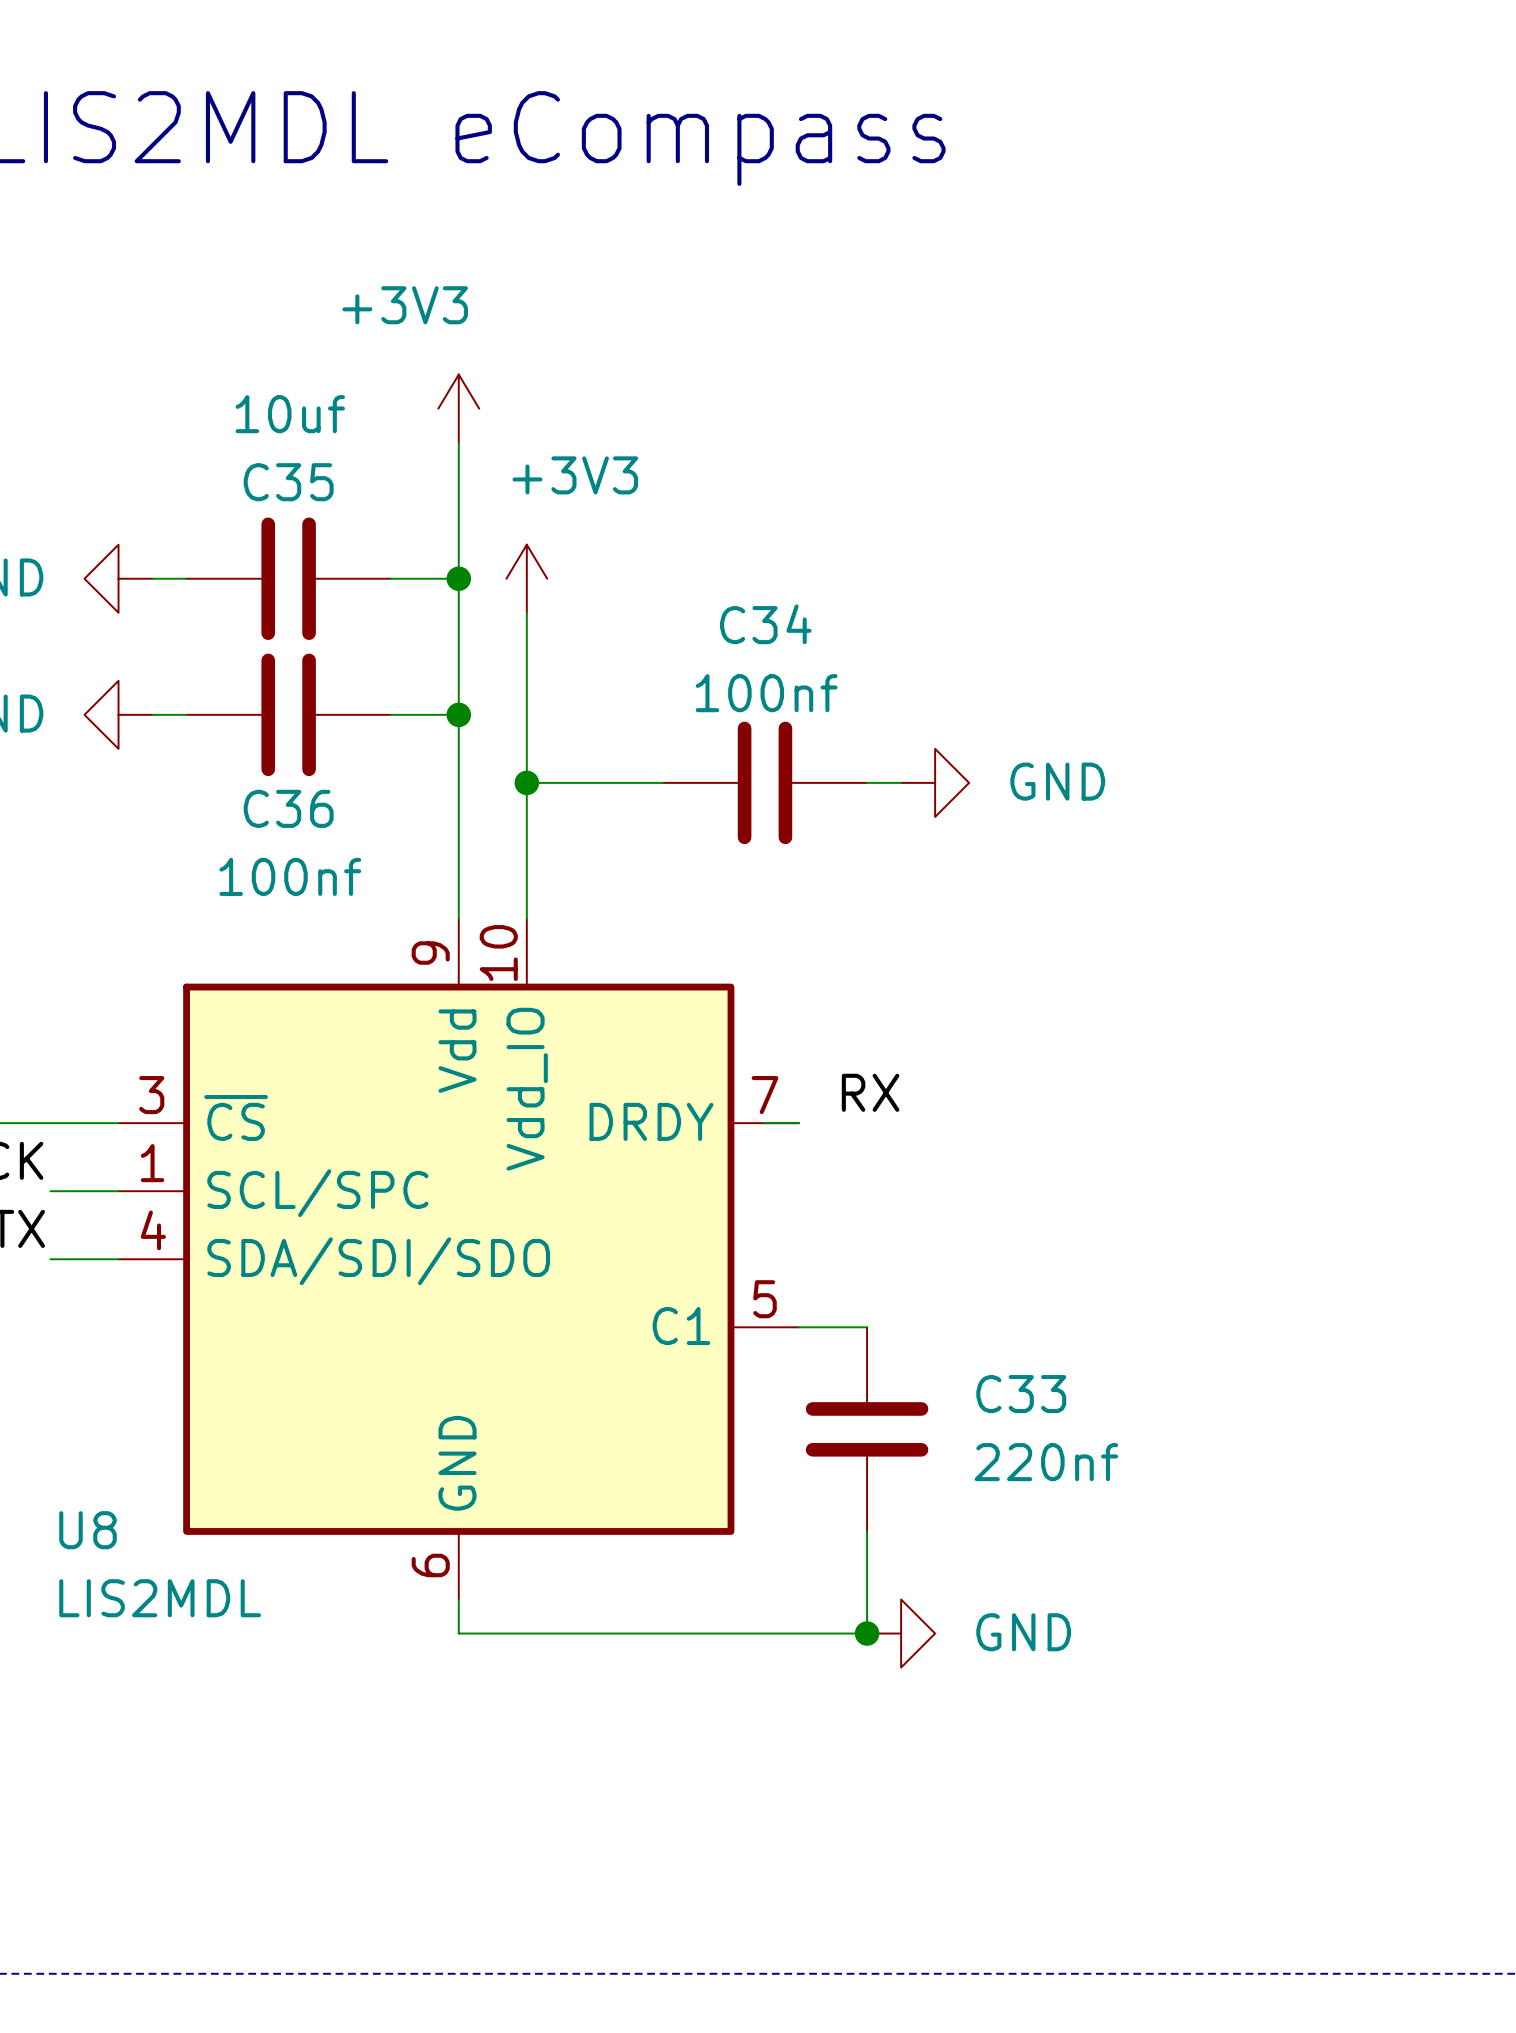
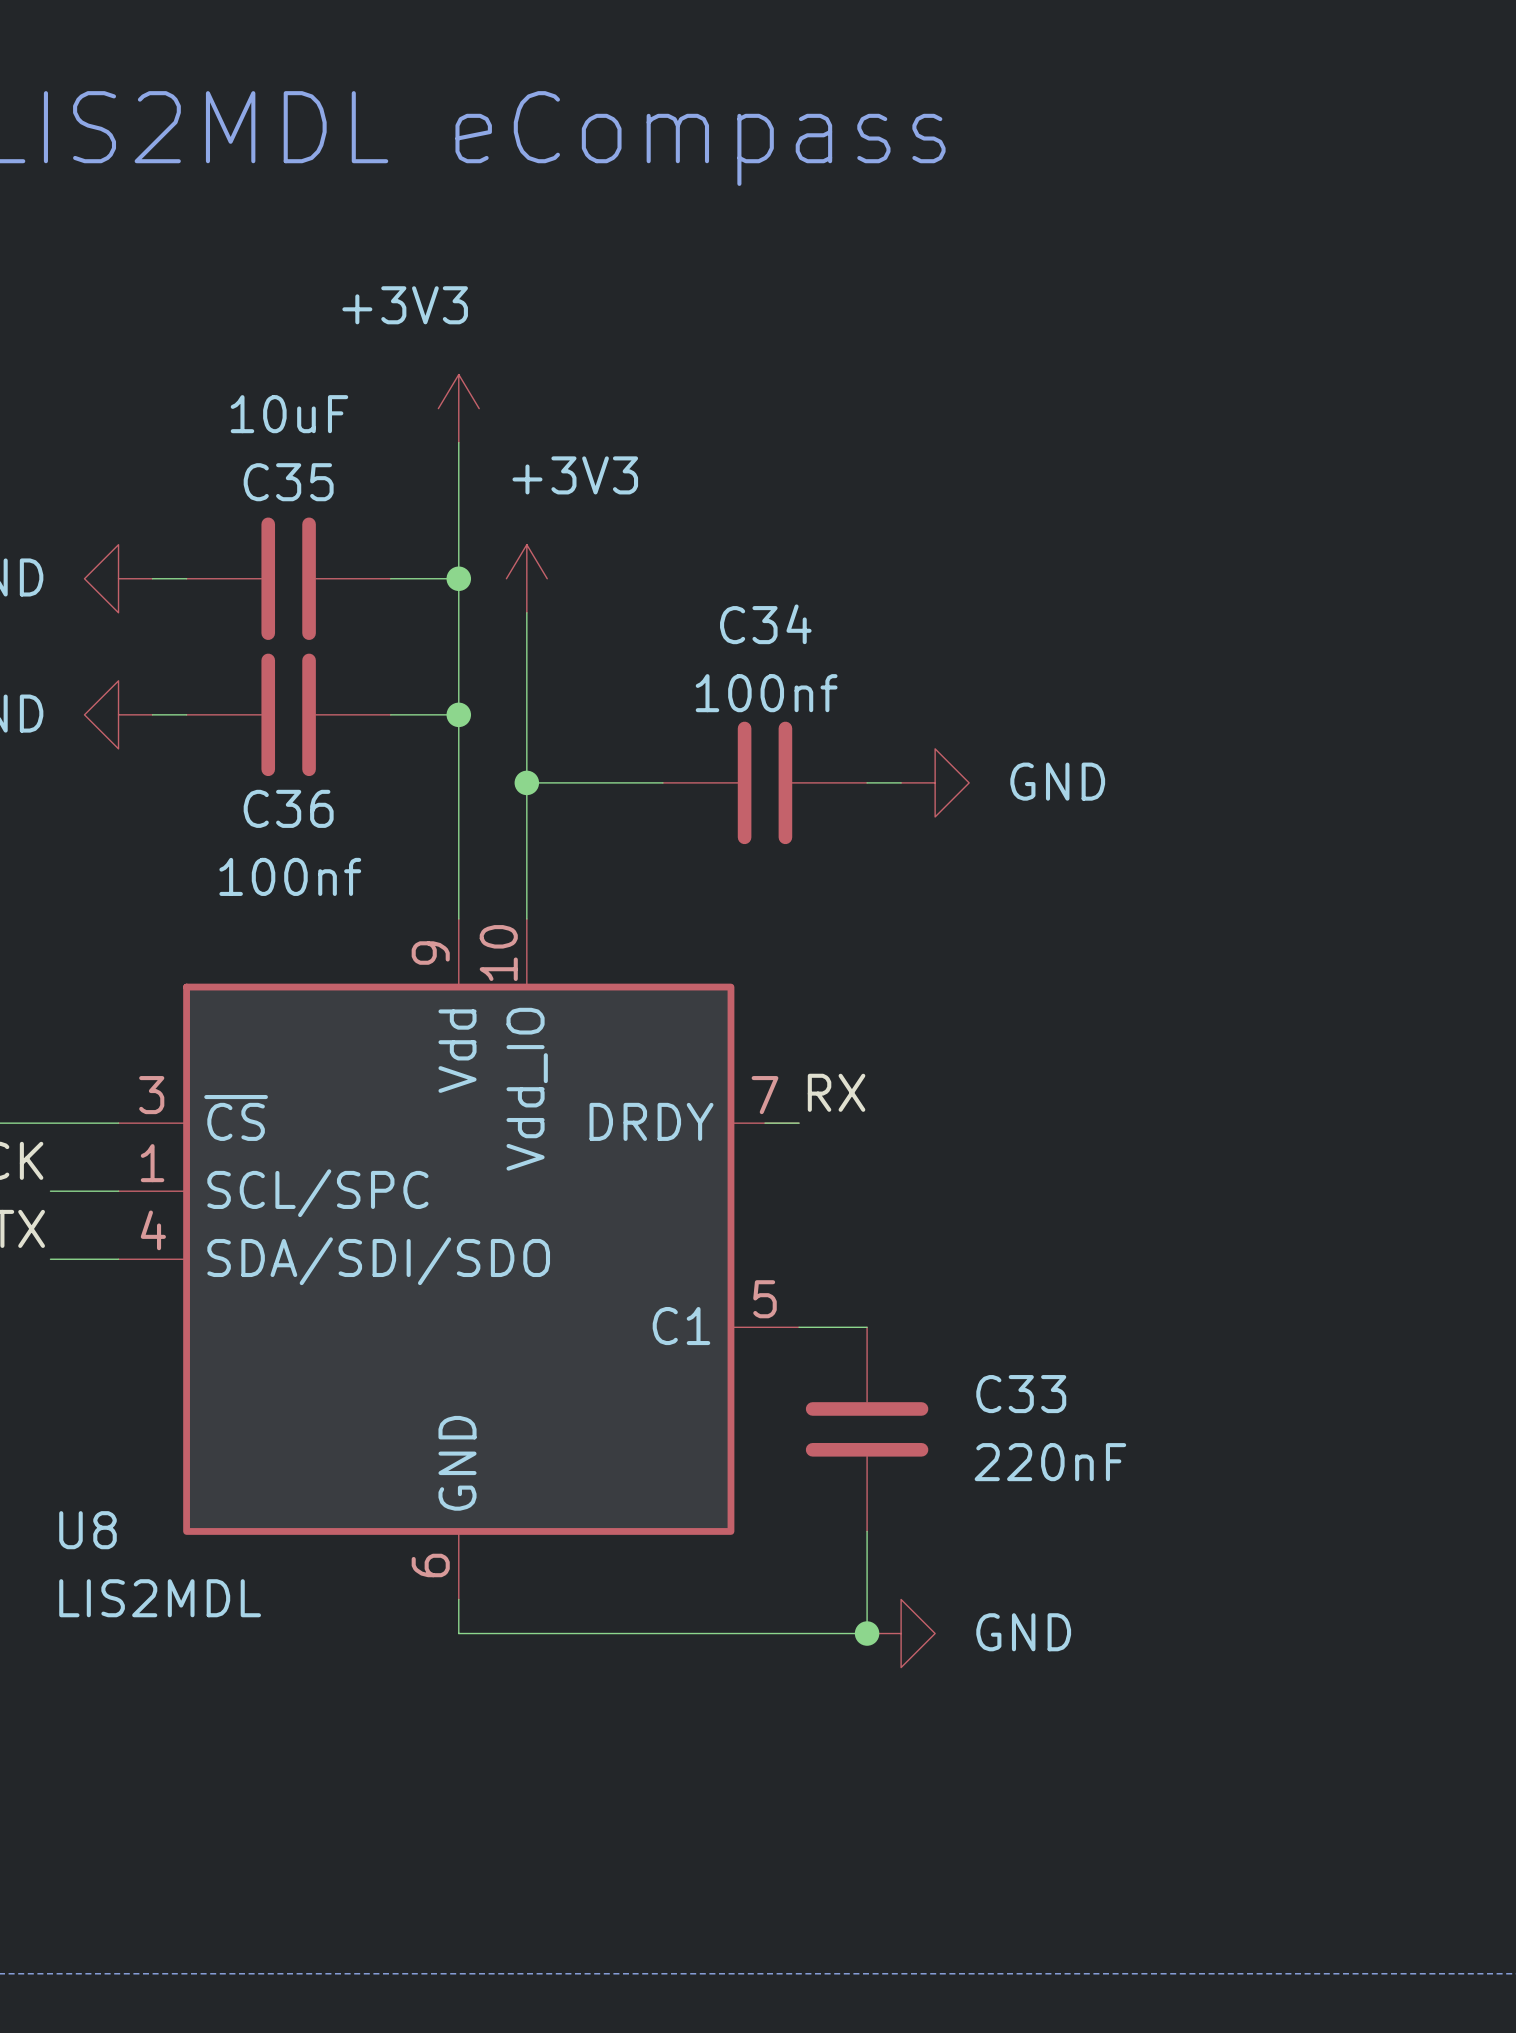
C35 value: 10uf (290, 414) -> 10uF (289, 414)
label position: RX (870, 1092) -> RX (836, 1092)
C33 value: 220nf (1046, 1462) -> 220nF (1050, 1462)

